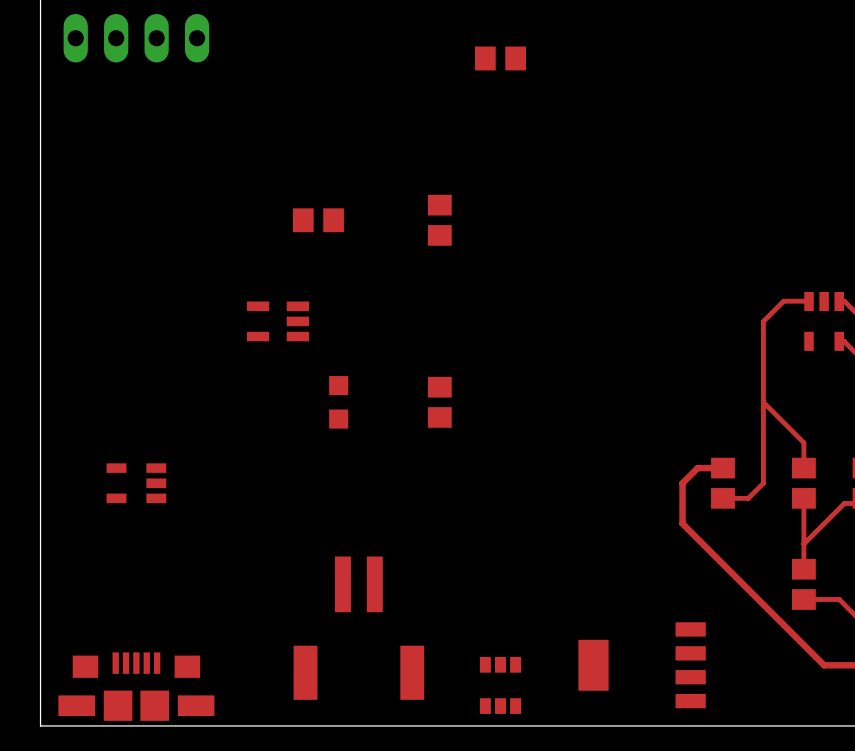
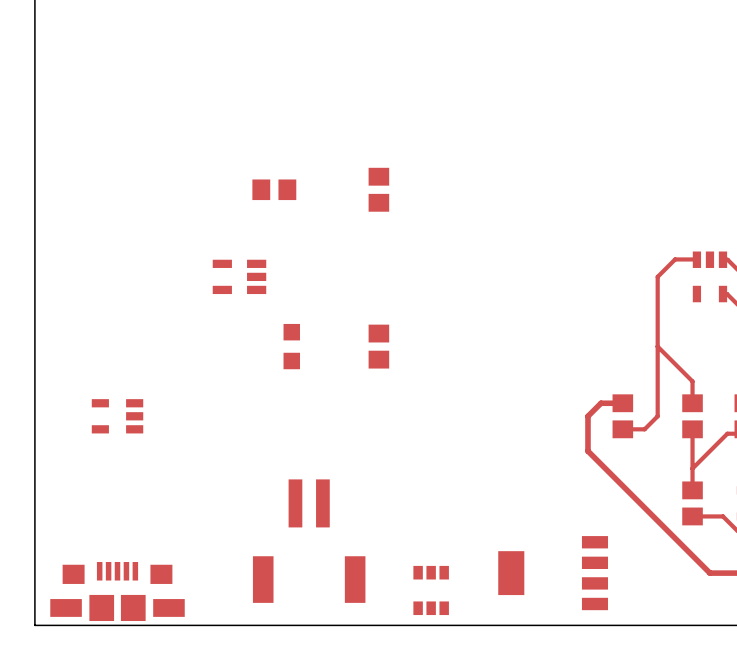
part: (136, 38) -> none
part: (500, 58) -> none

